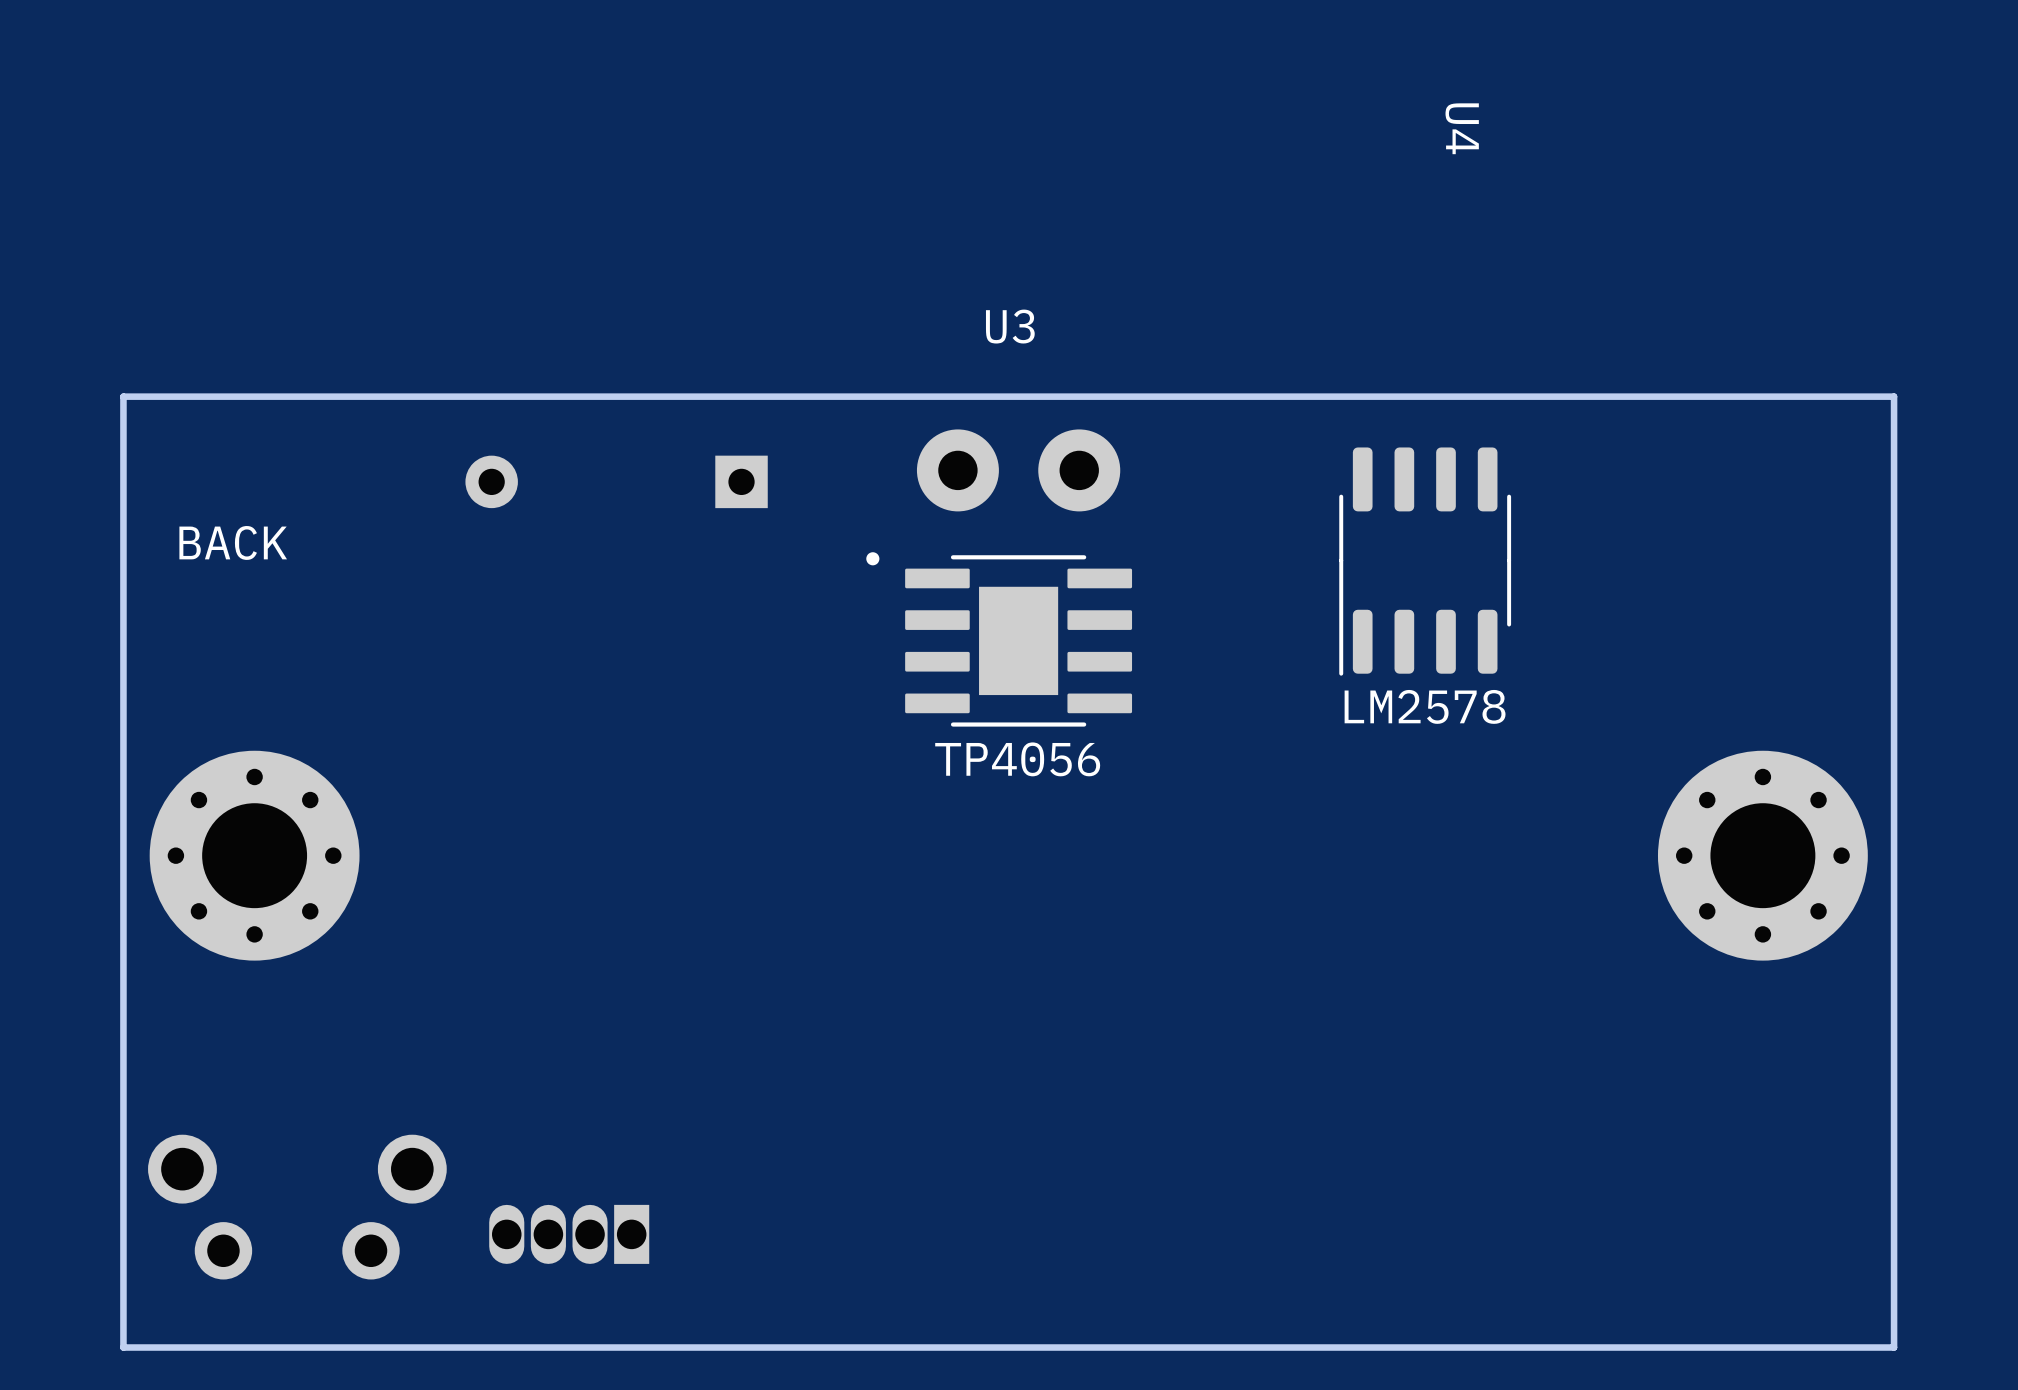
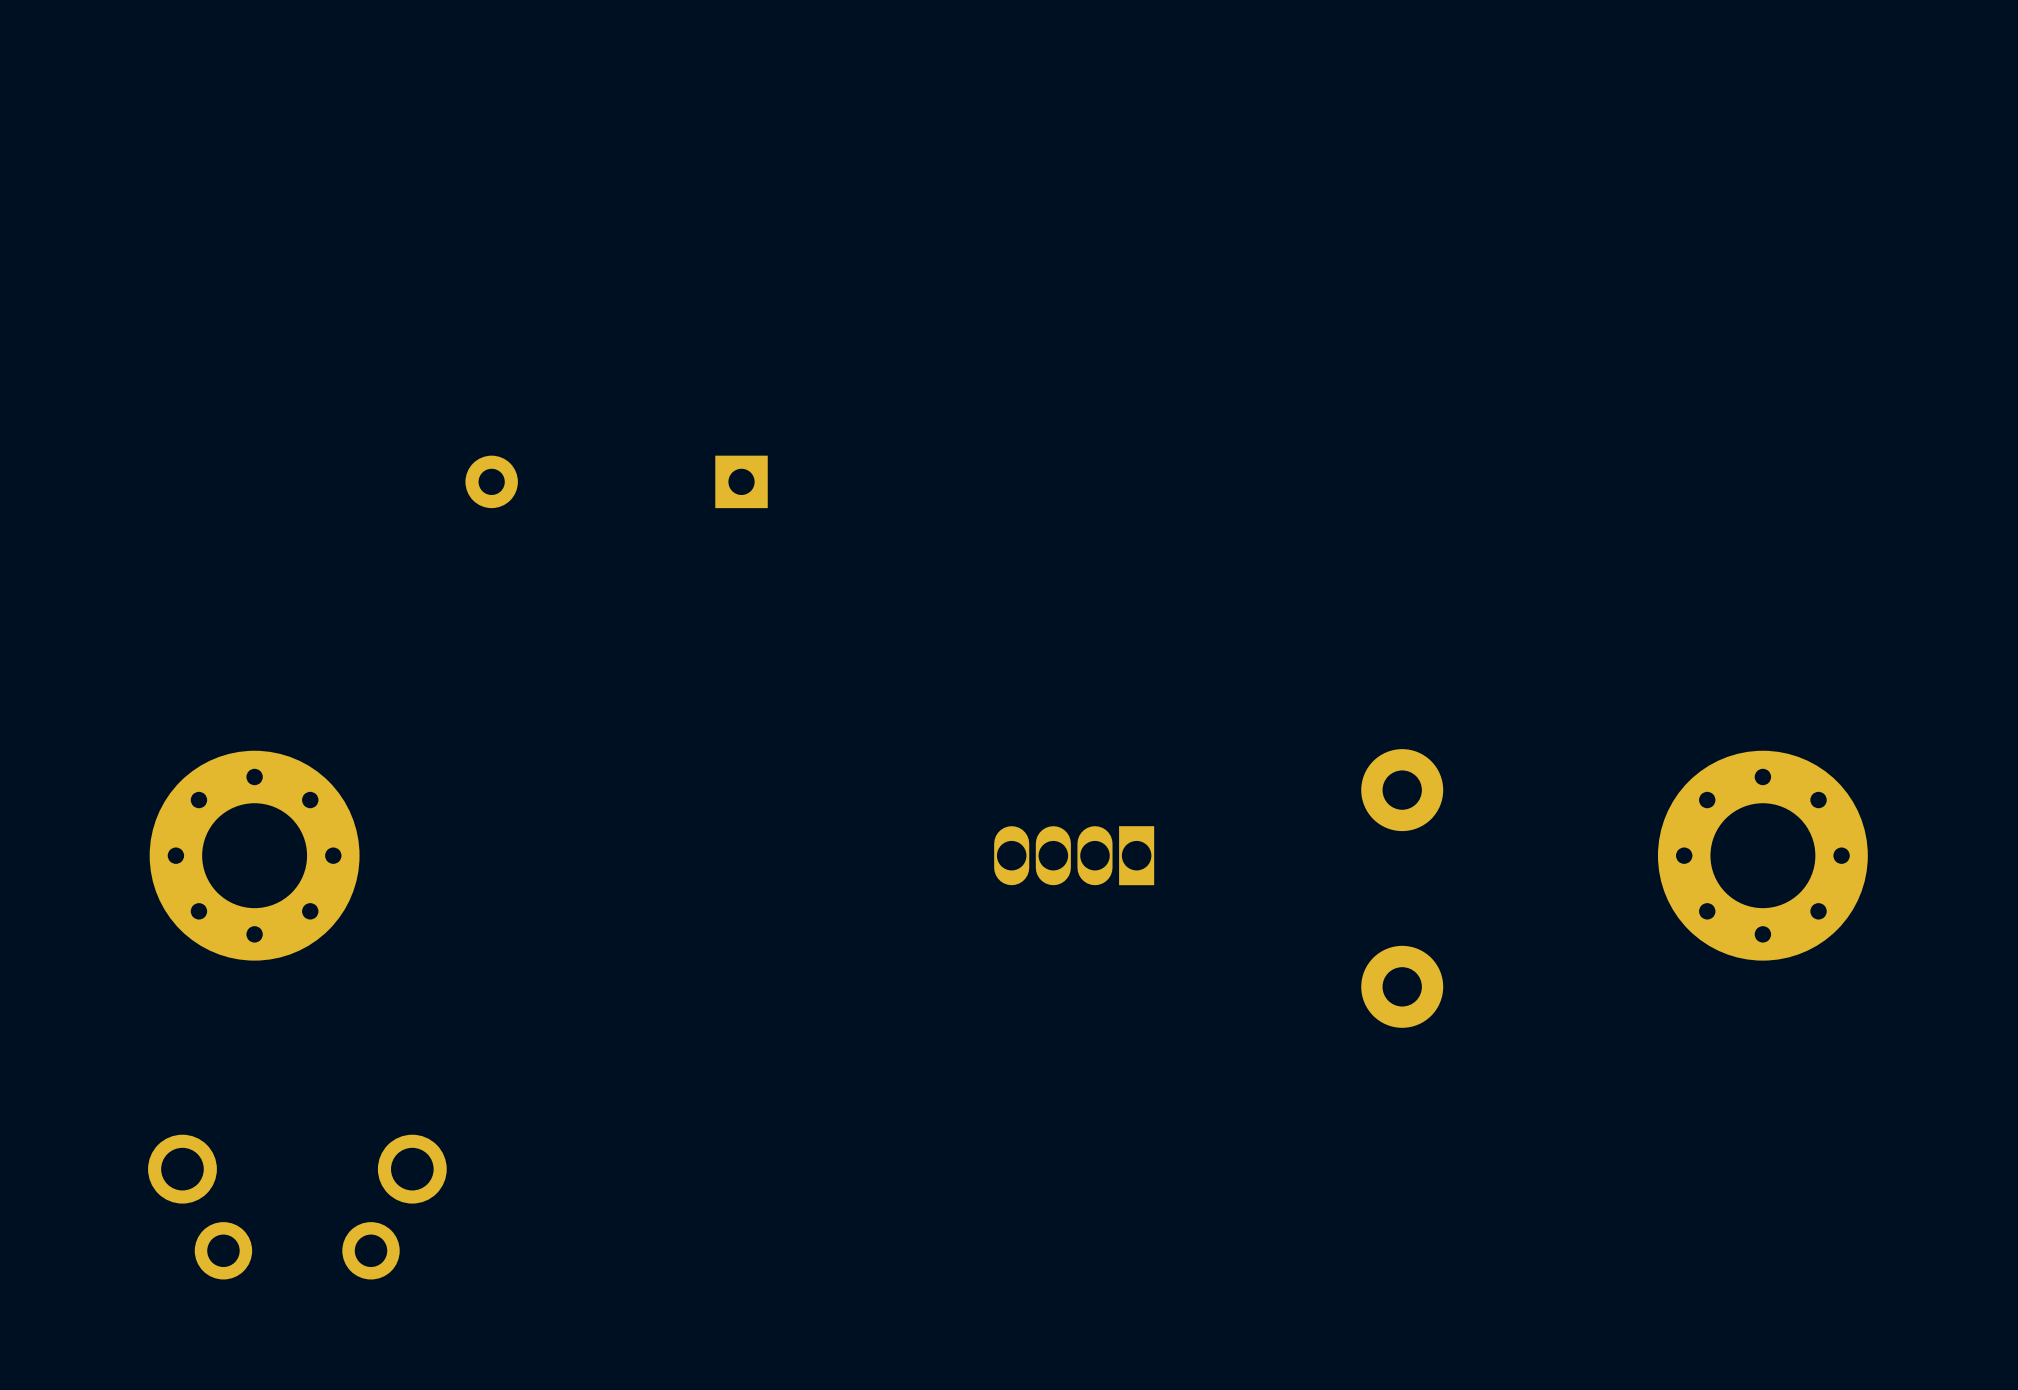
board edge: (1894, 396) (1894, 1347) (123, 1347) (123, 396) (1894, 396) -> none
part: (957, 470) -> none
part: (1079, 470) -> none
text: BACK (233, 542) -> none
U4: (1425, 561) -> none
U3: (999, 639) -> none
text: LM2578 (1425, 706) -> none
text: TP4056 (1017, 759) -> none
part: none -> (1402, 790)
part: none -> (1402, 986)
part position: (569, 1234) -> (1074, 855)

